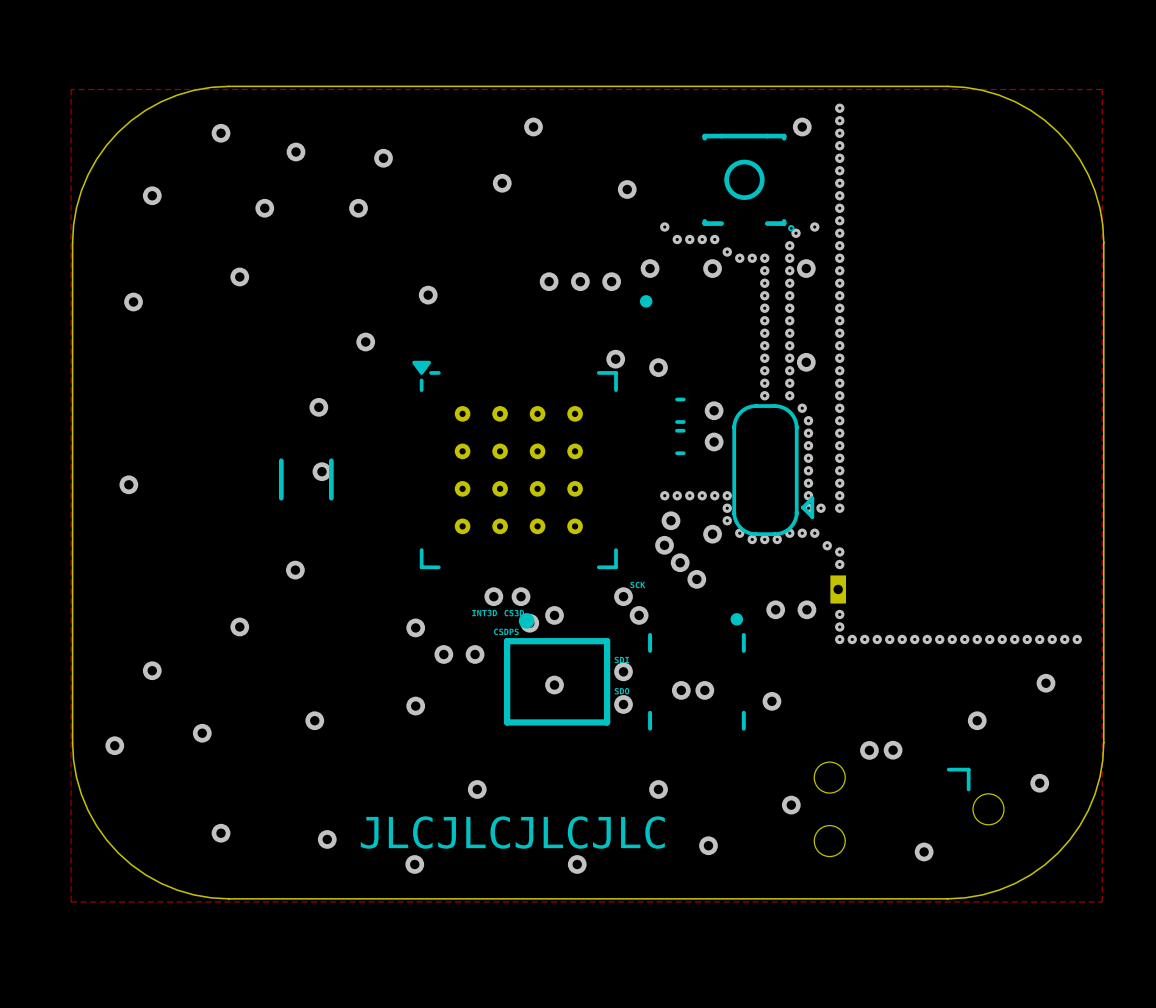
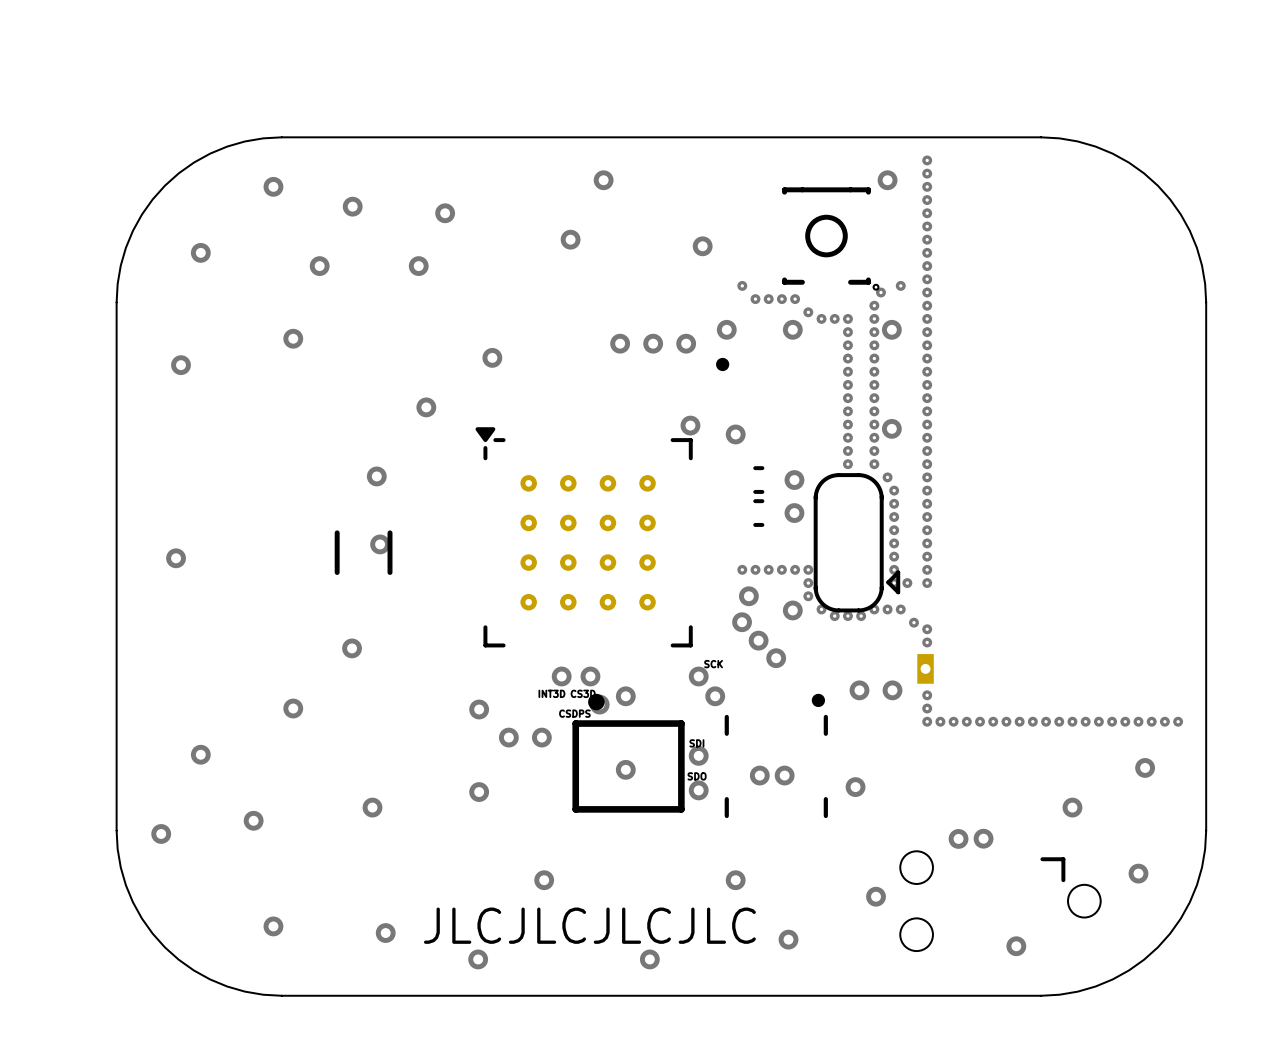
zone outline: (71, 89) (71, 901) (1102, 901) (1102, 89) (71, 89) -> none

